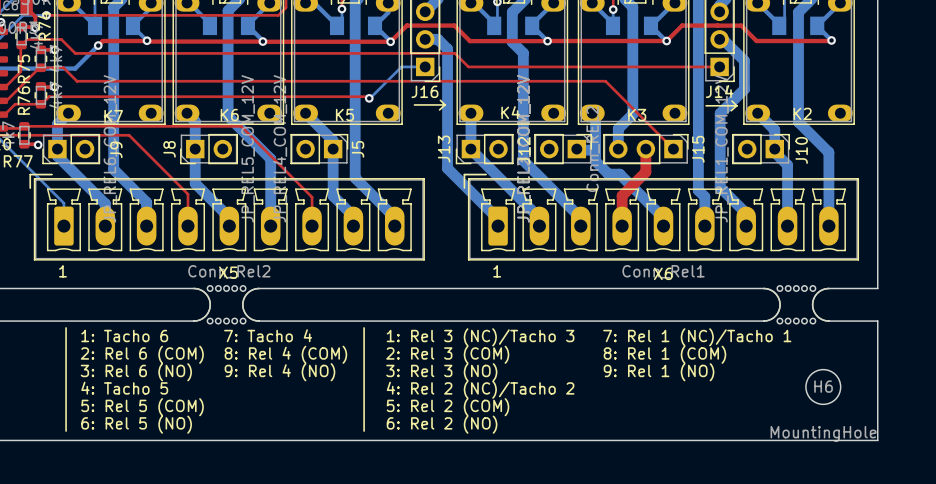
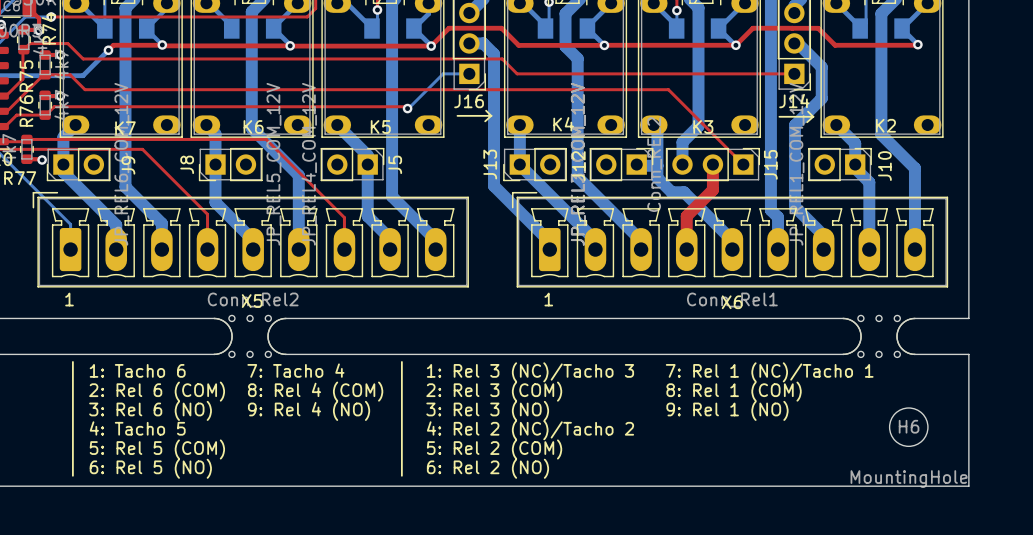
part footprint: [193, 285, 260, 324] -> [213, 315, 287, 358]
part footprint: [763, 285, 830, 324] -> [842, 315, 916, 358]

